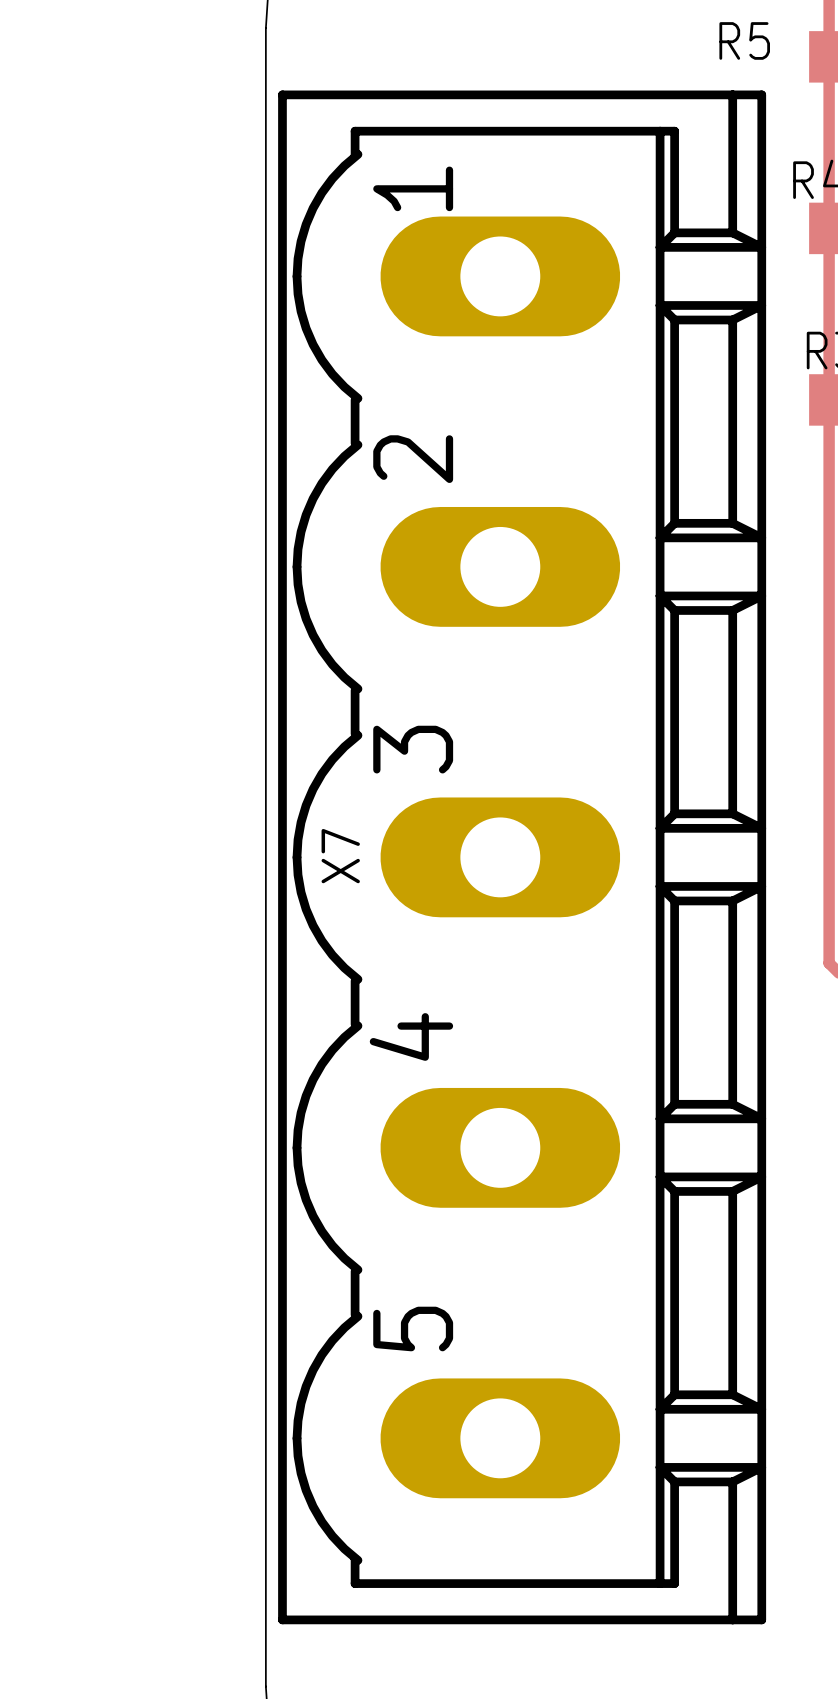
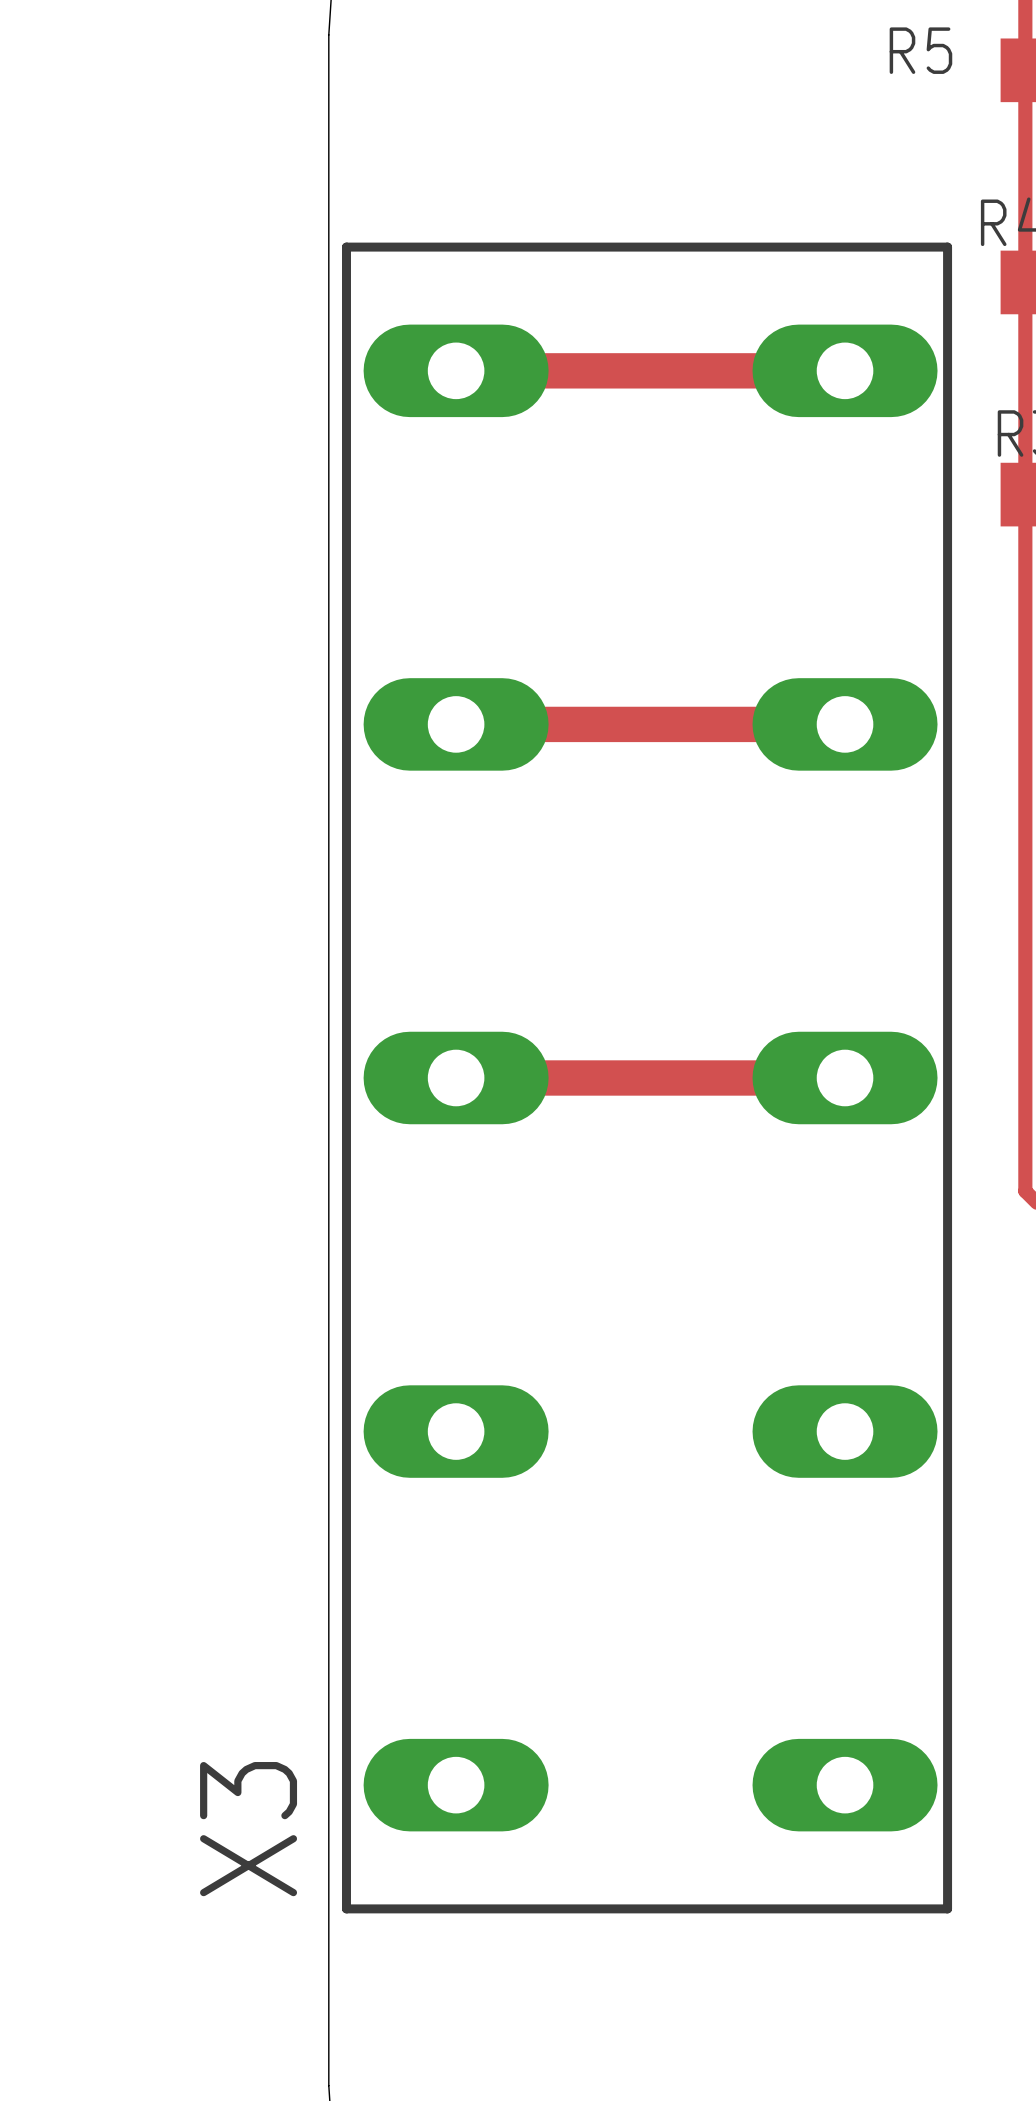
track: none -> (456, 370) (845, 370)
track: none -> (456, 724) (845, 724)
X7: (522, 857) -> none
track: none -> (456, 1077) (845, 1077)
X3: none -> (647, 1077)

